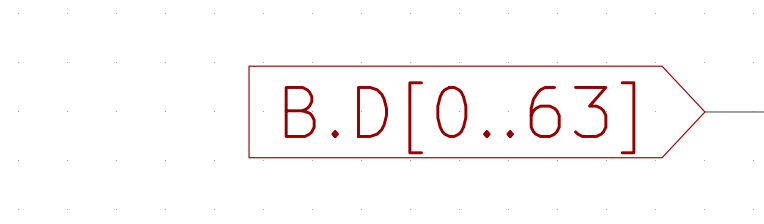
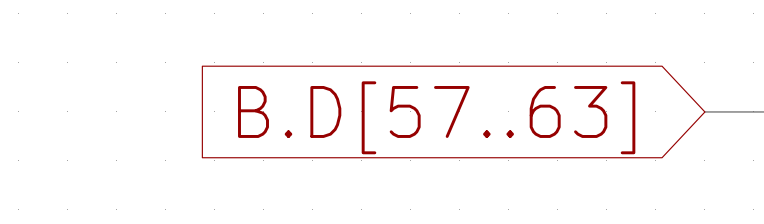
global label: B.D[0..63] (460, 117) -> B.D[57..63] (436, 117)

